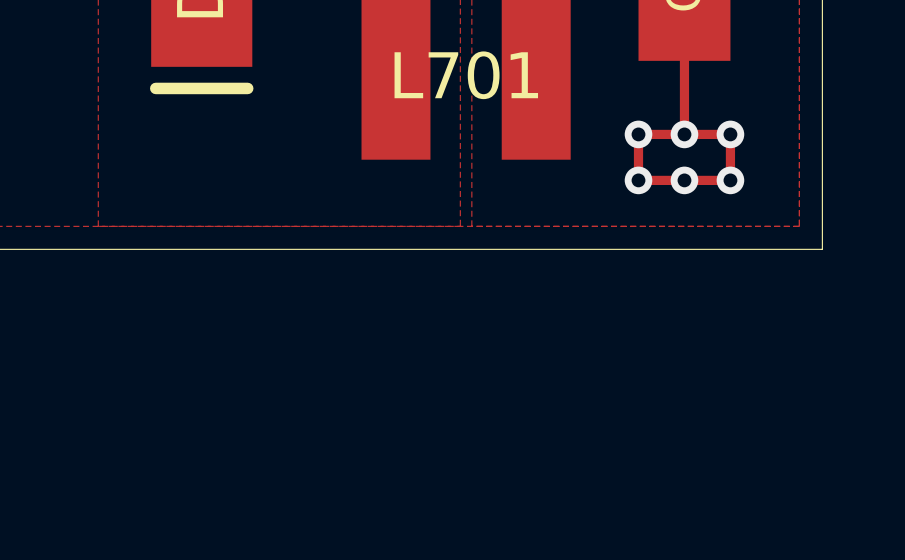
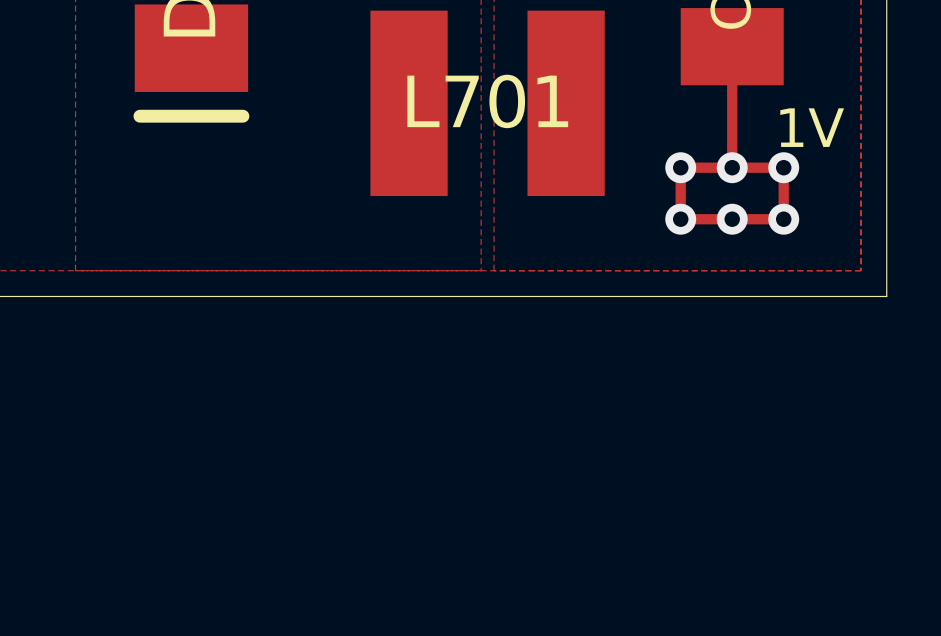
text: none -> 1V (812, 127)

